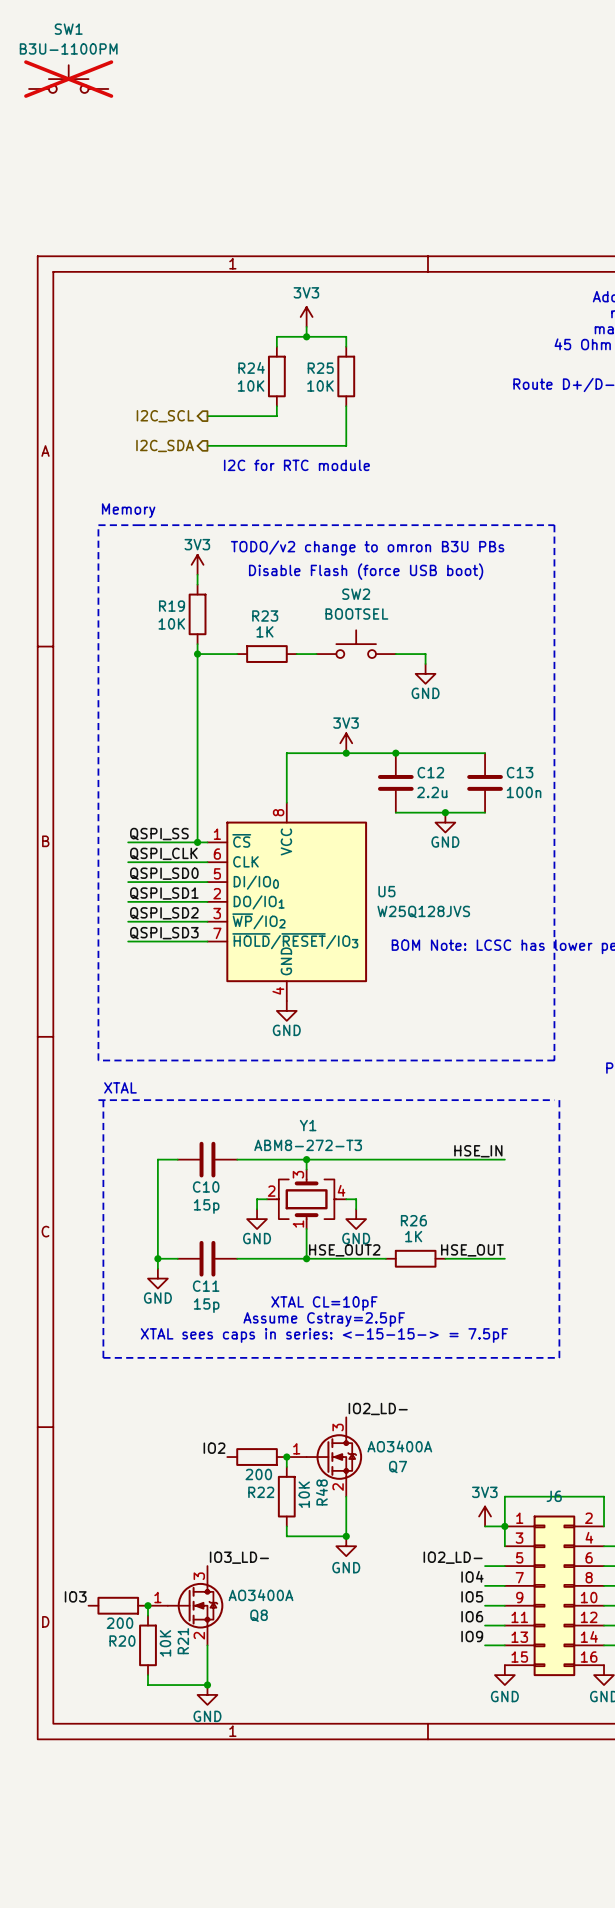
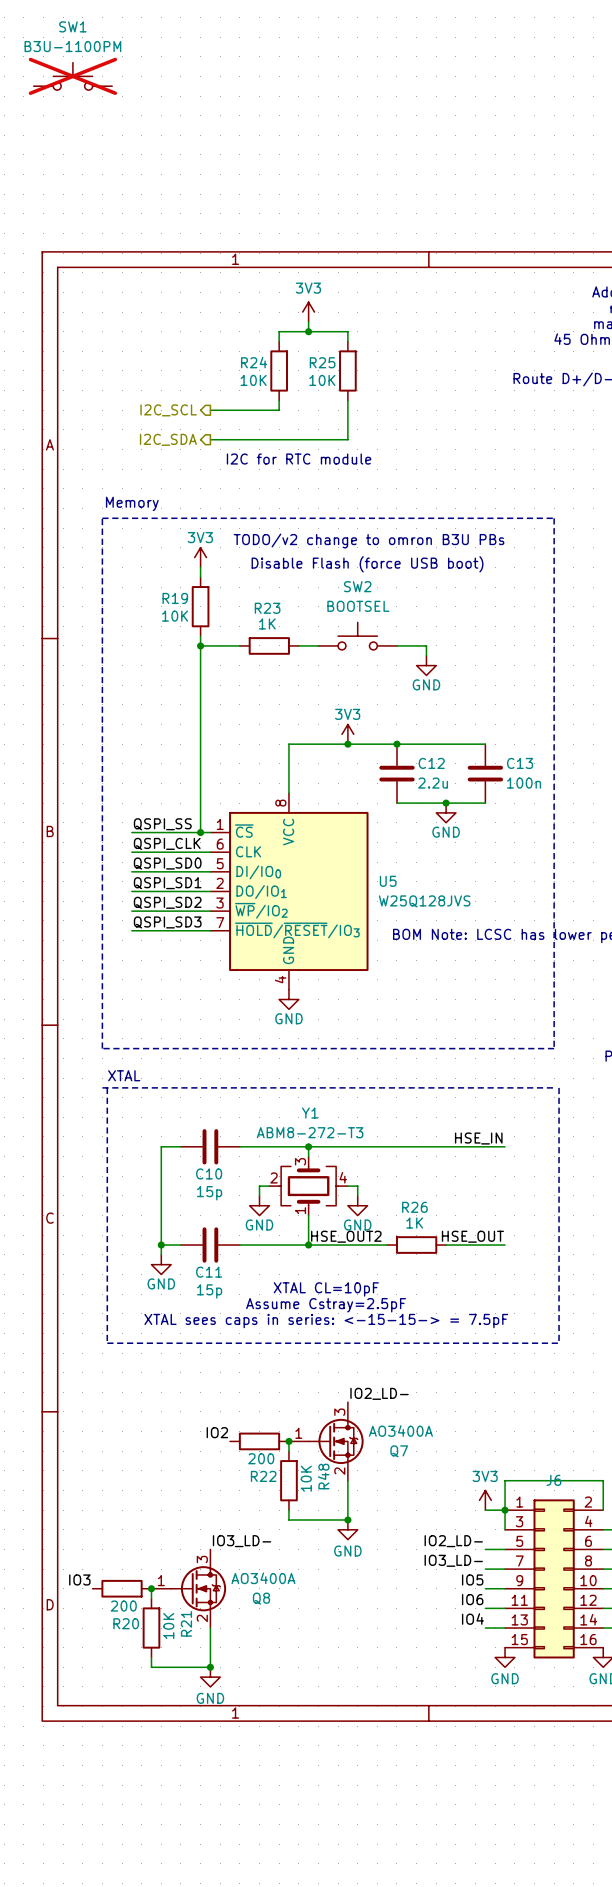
label: IO4 (472, 1576) -> IO3_LD- (453, 1560)
label: IO9 (472, 1636) -> IO4 (472, 1619)

